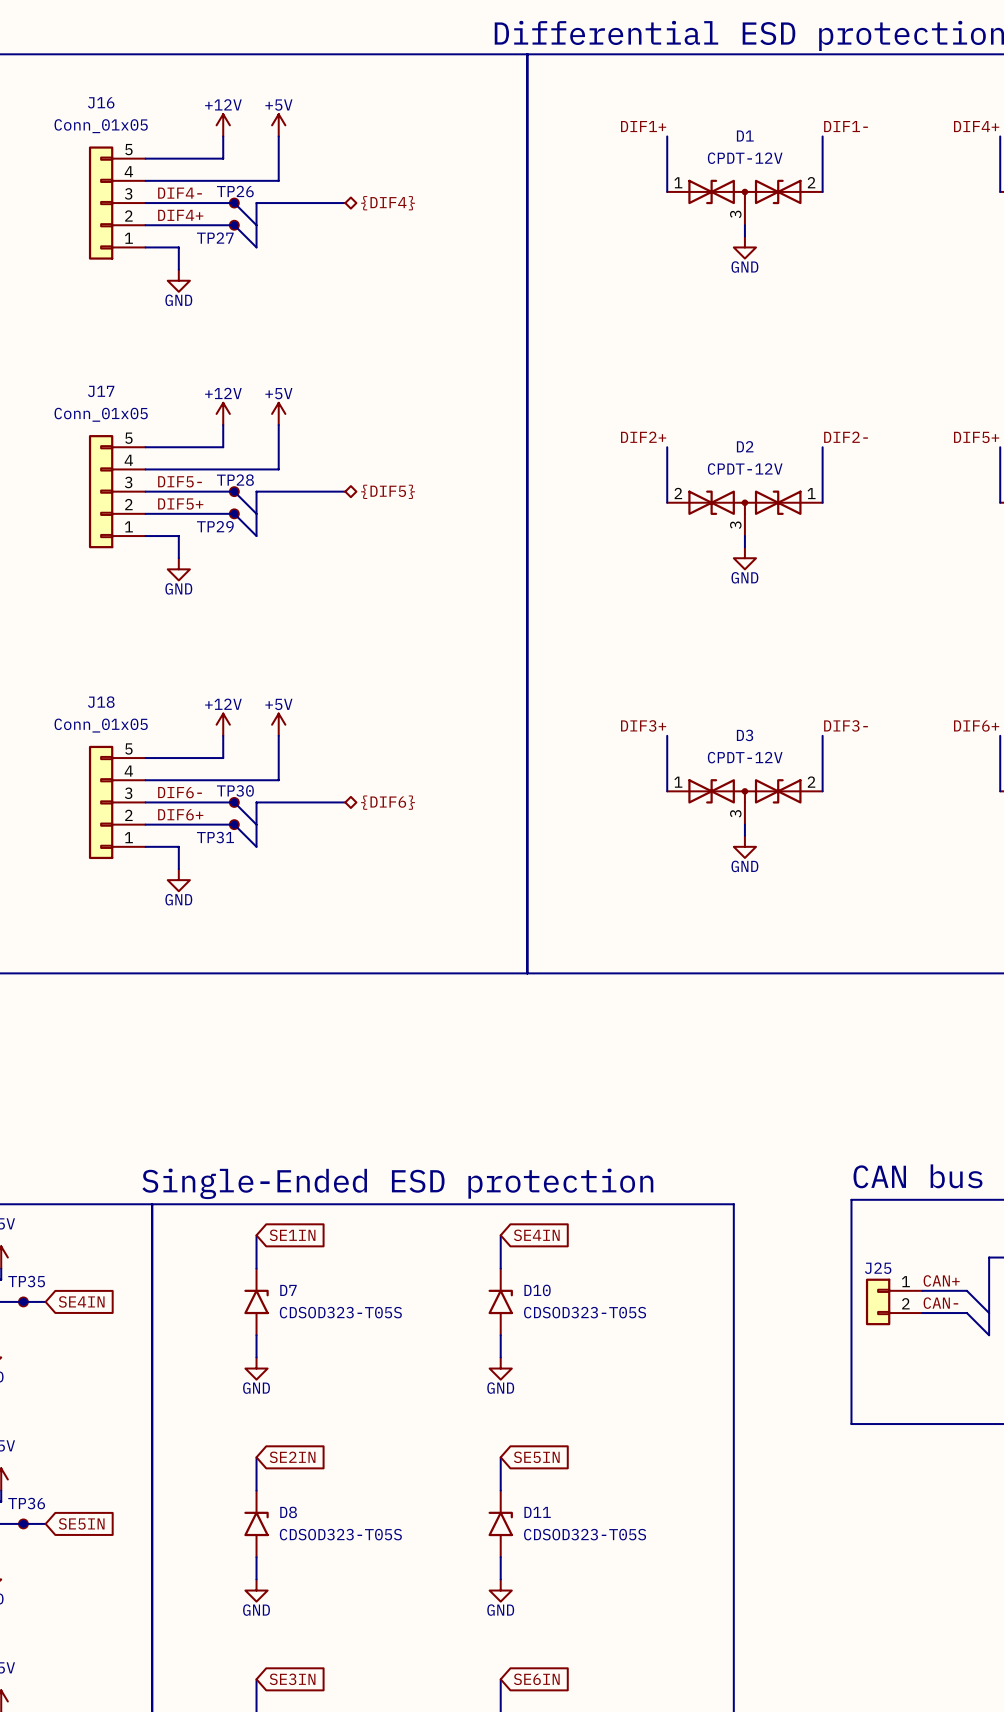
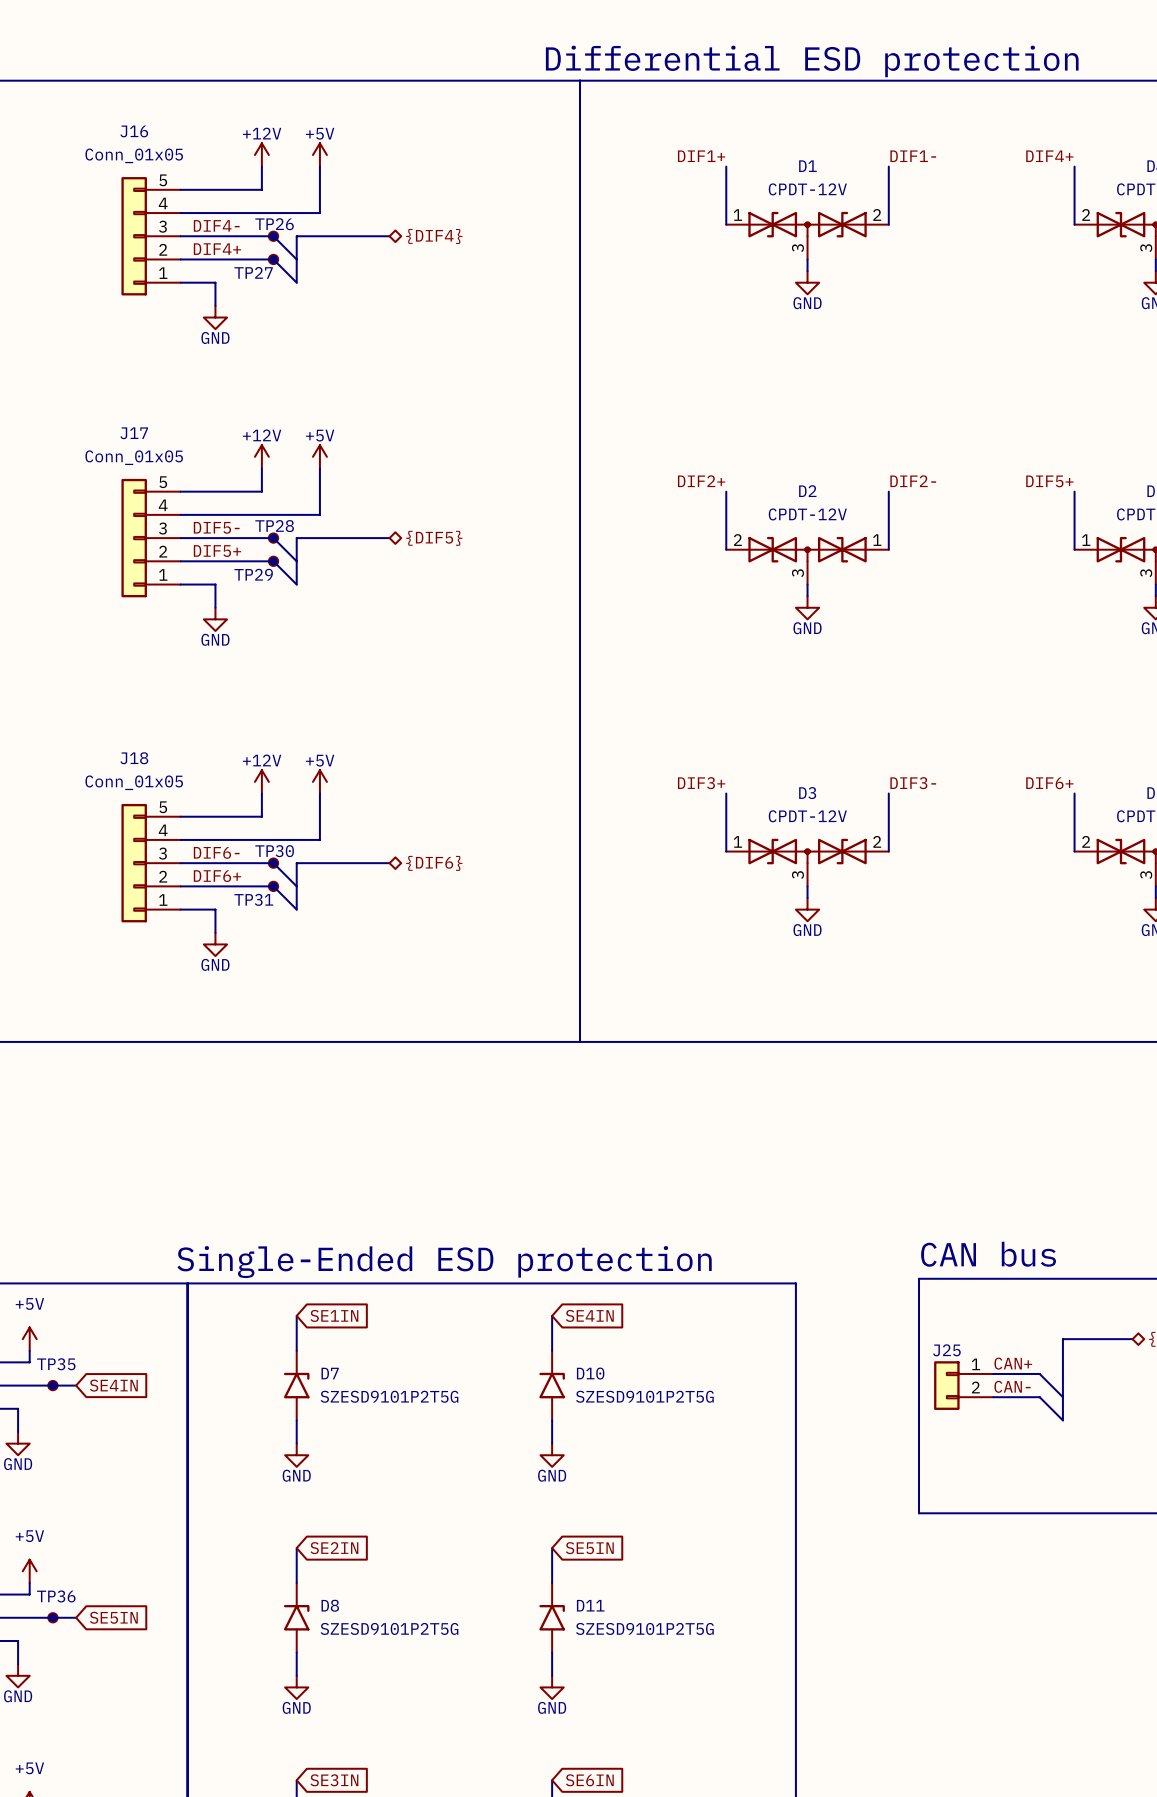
D7 value: CDSOD323-T05S (340, 1312) -> SZESD9101P2T5G (389, 1396)
D10 value: CDSOD323-T05S (585, 1312) -> SZESD9101P2T5G (644, 1396)
D8 value: CDSOD323-T05S (340, 1534) -> SZESD9101P2T5G (389, 1628)
D11 value: CDSOD323-T05S (585, 1534) -> SZESD9101P2T5G (644, 1628)

